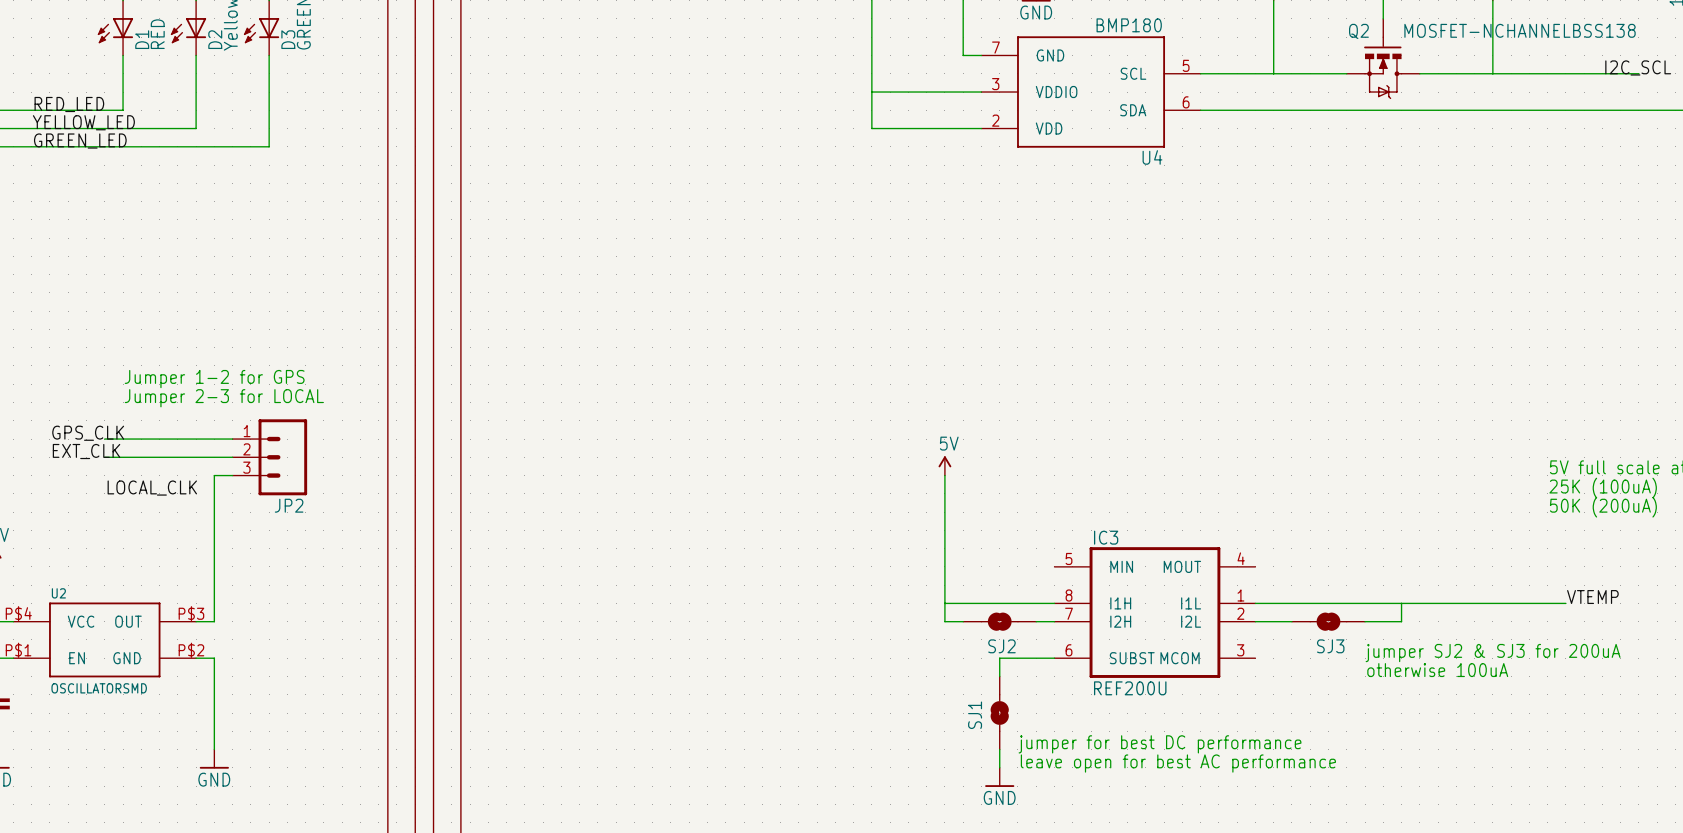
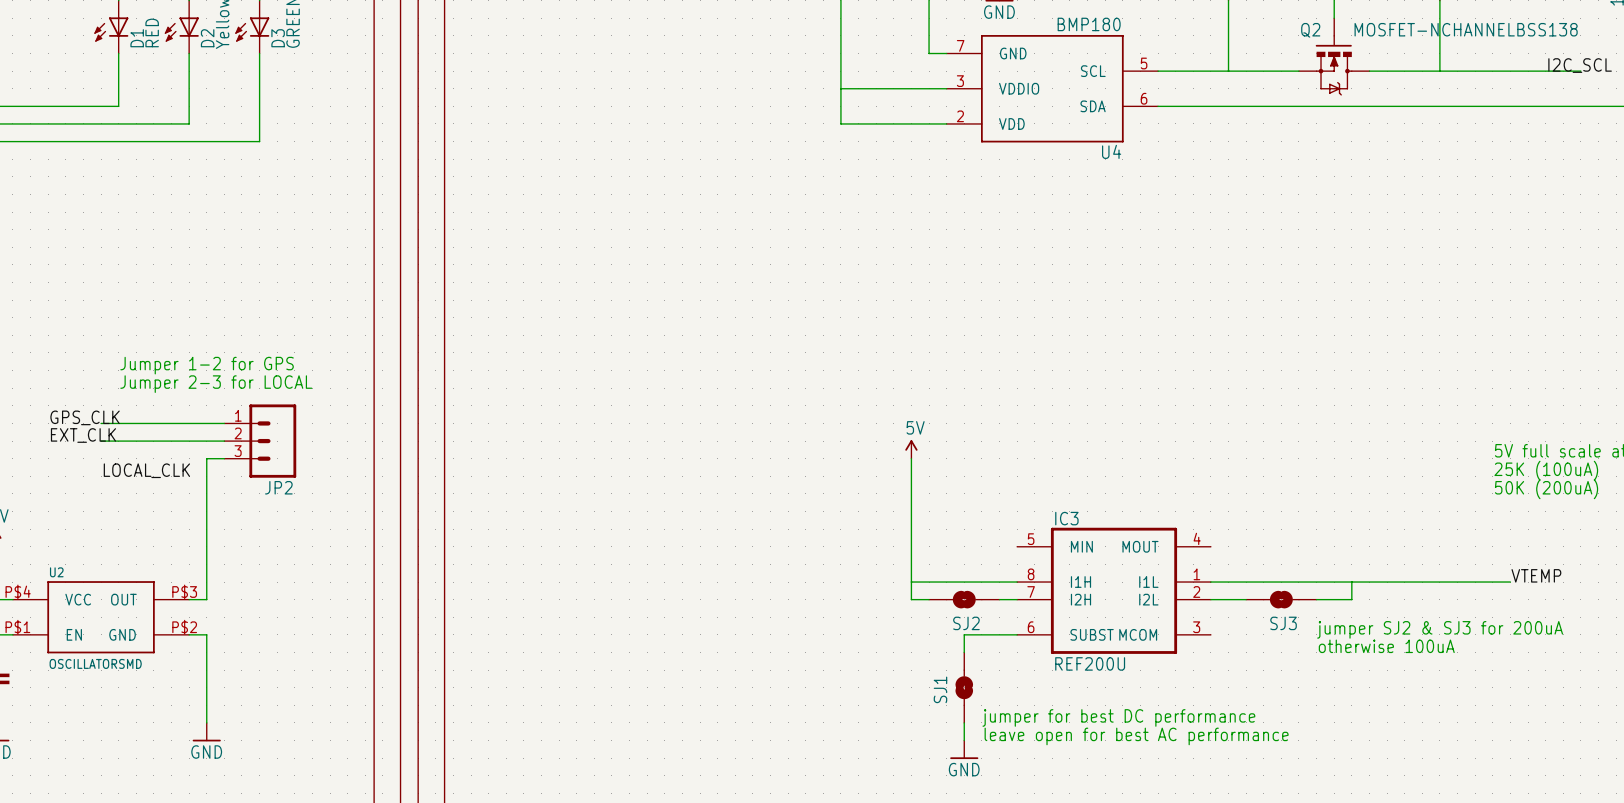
label: RED_LED (69, 104) -> none
label: YELLOW_LED (83, 122) -> none
label: GREEN_LED (80, 141) -> none

